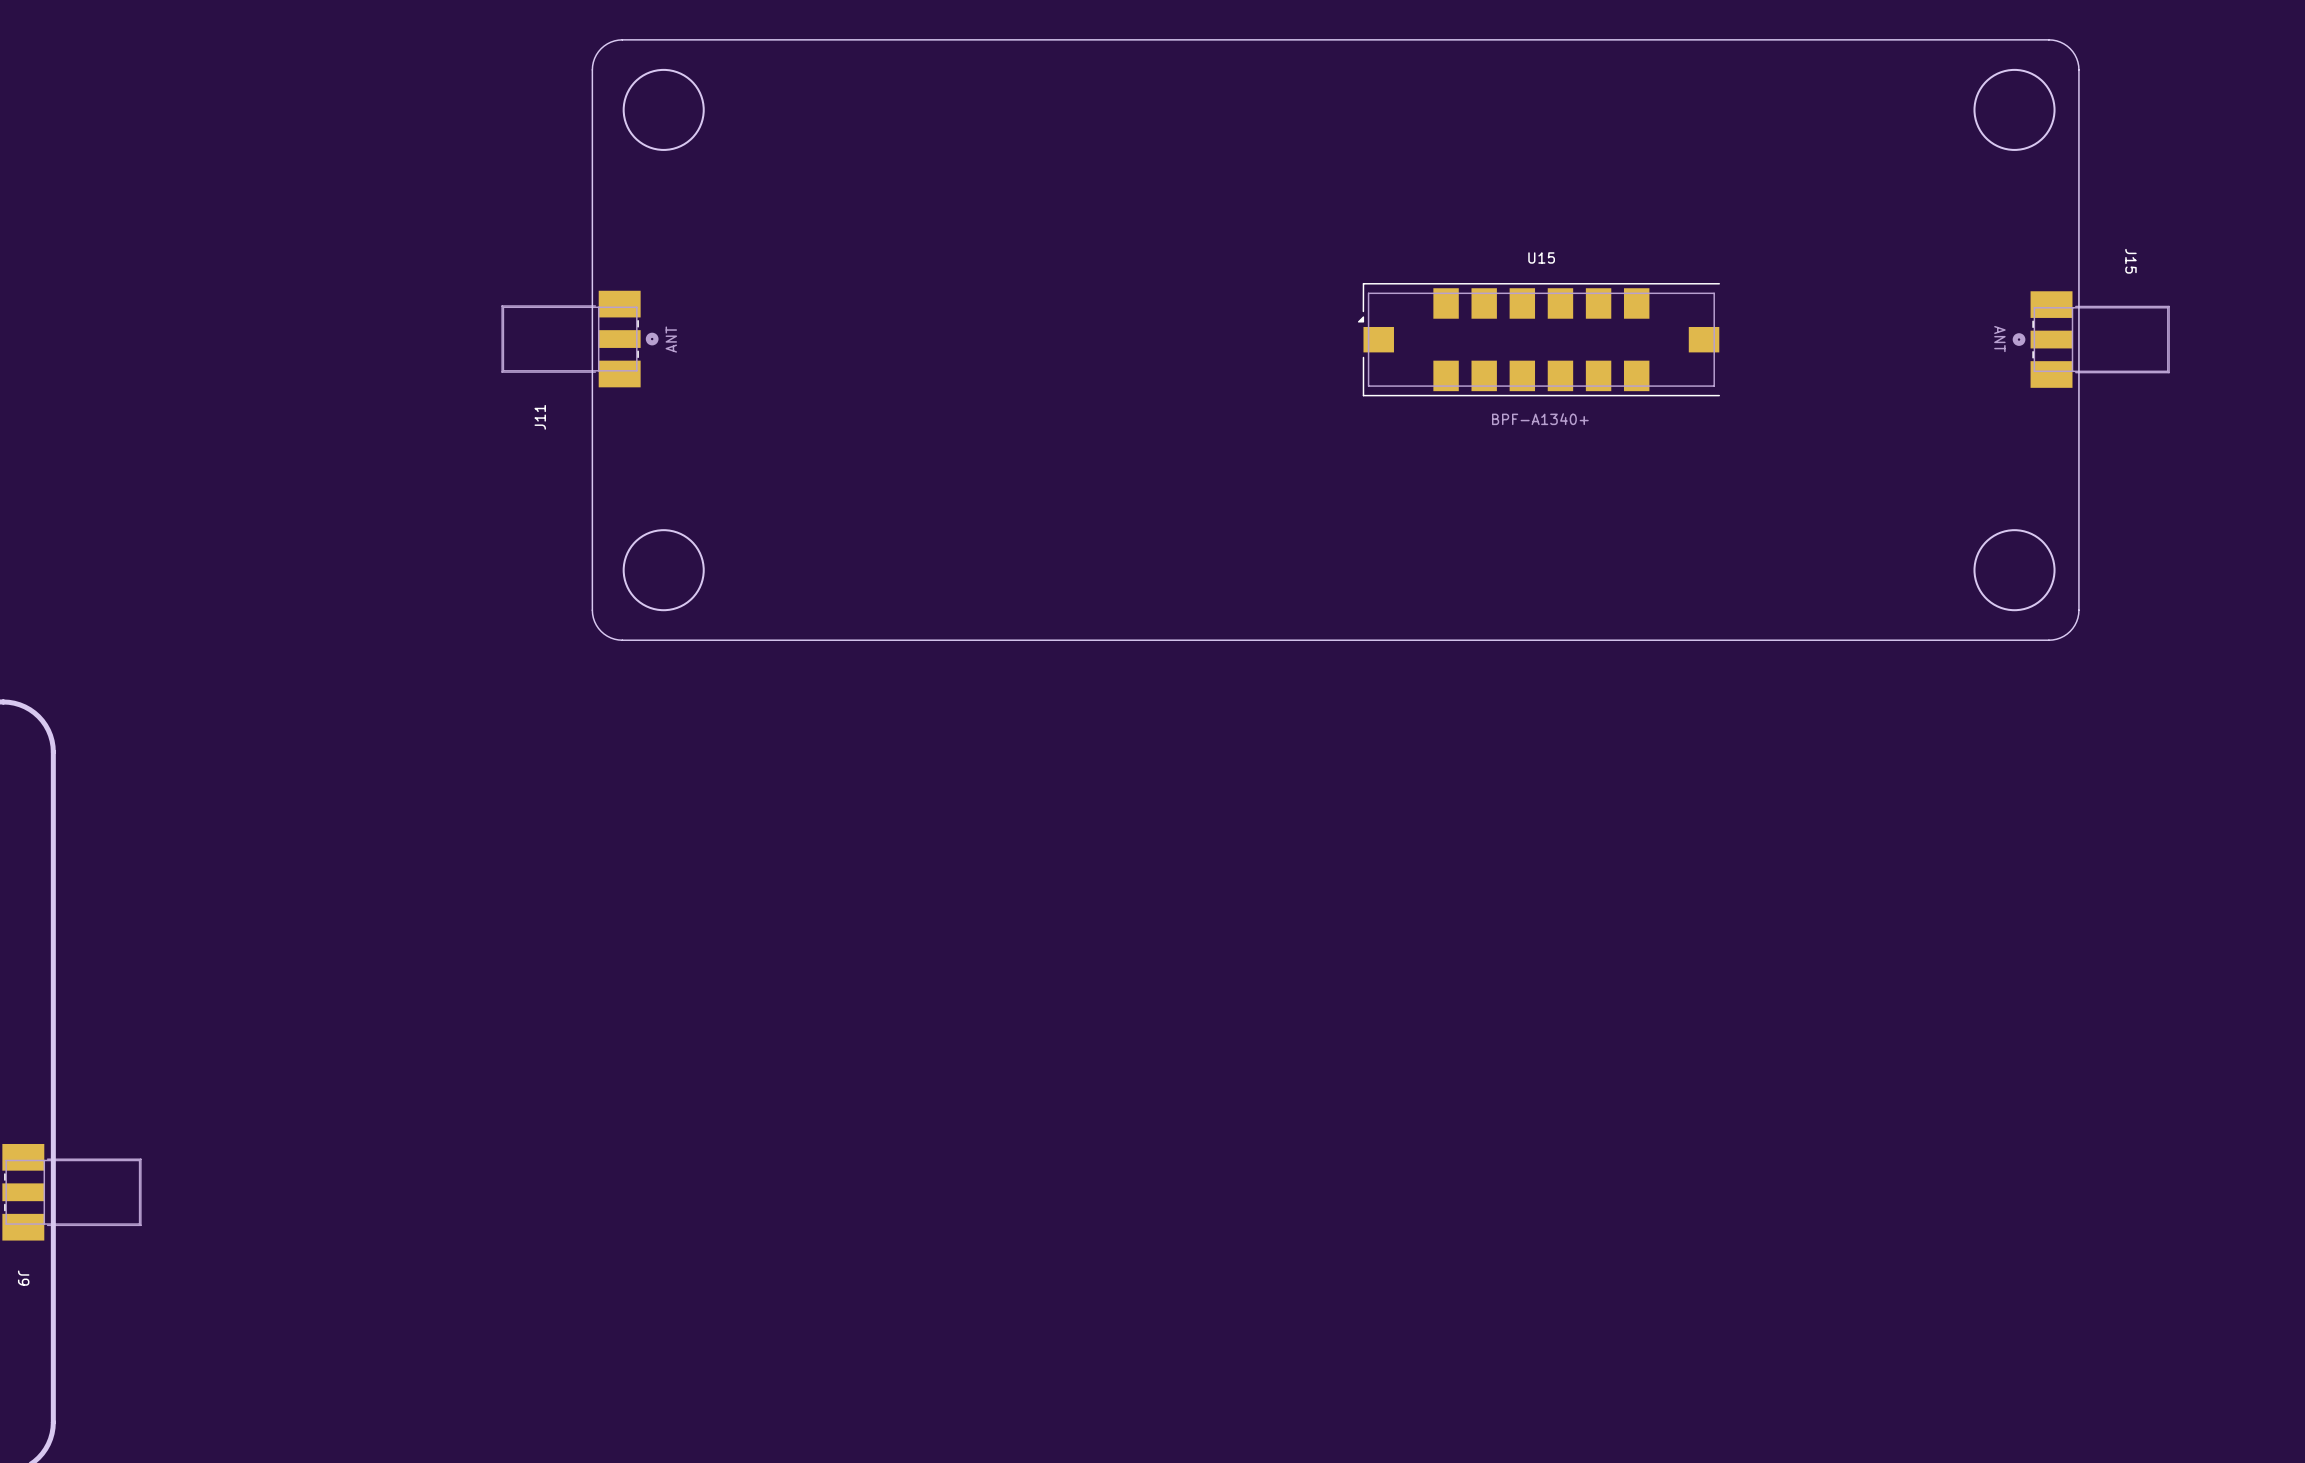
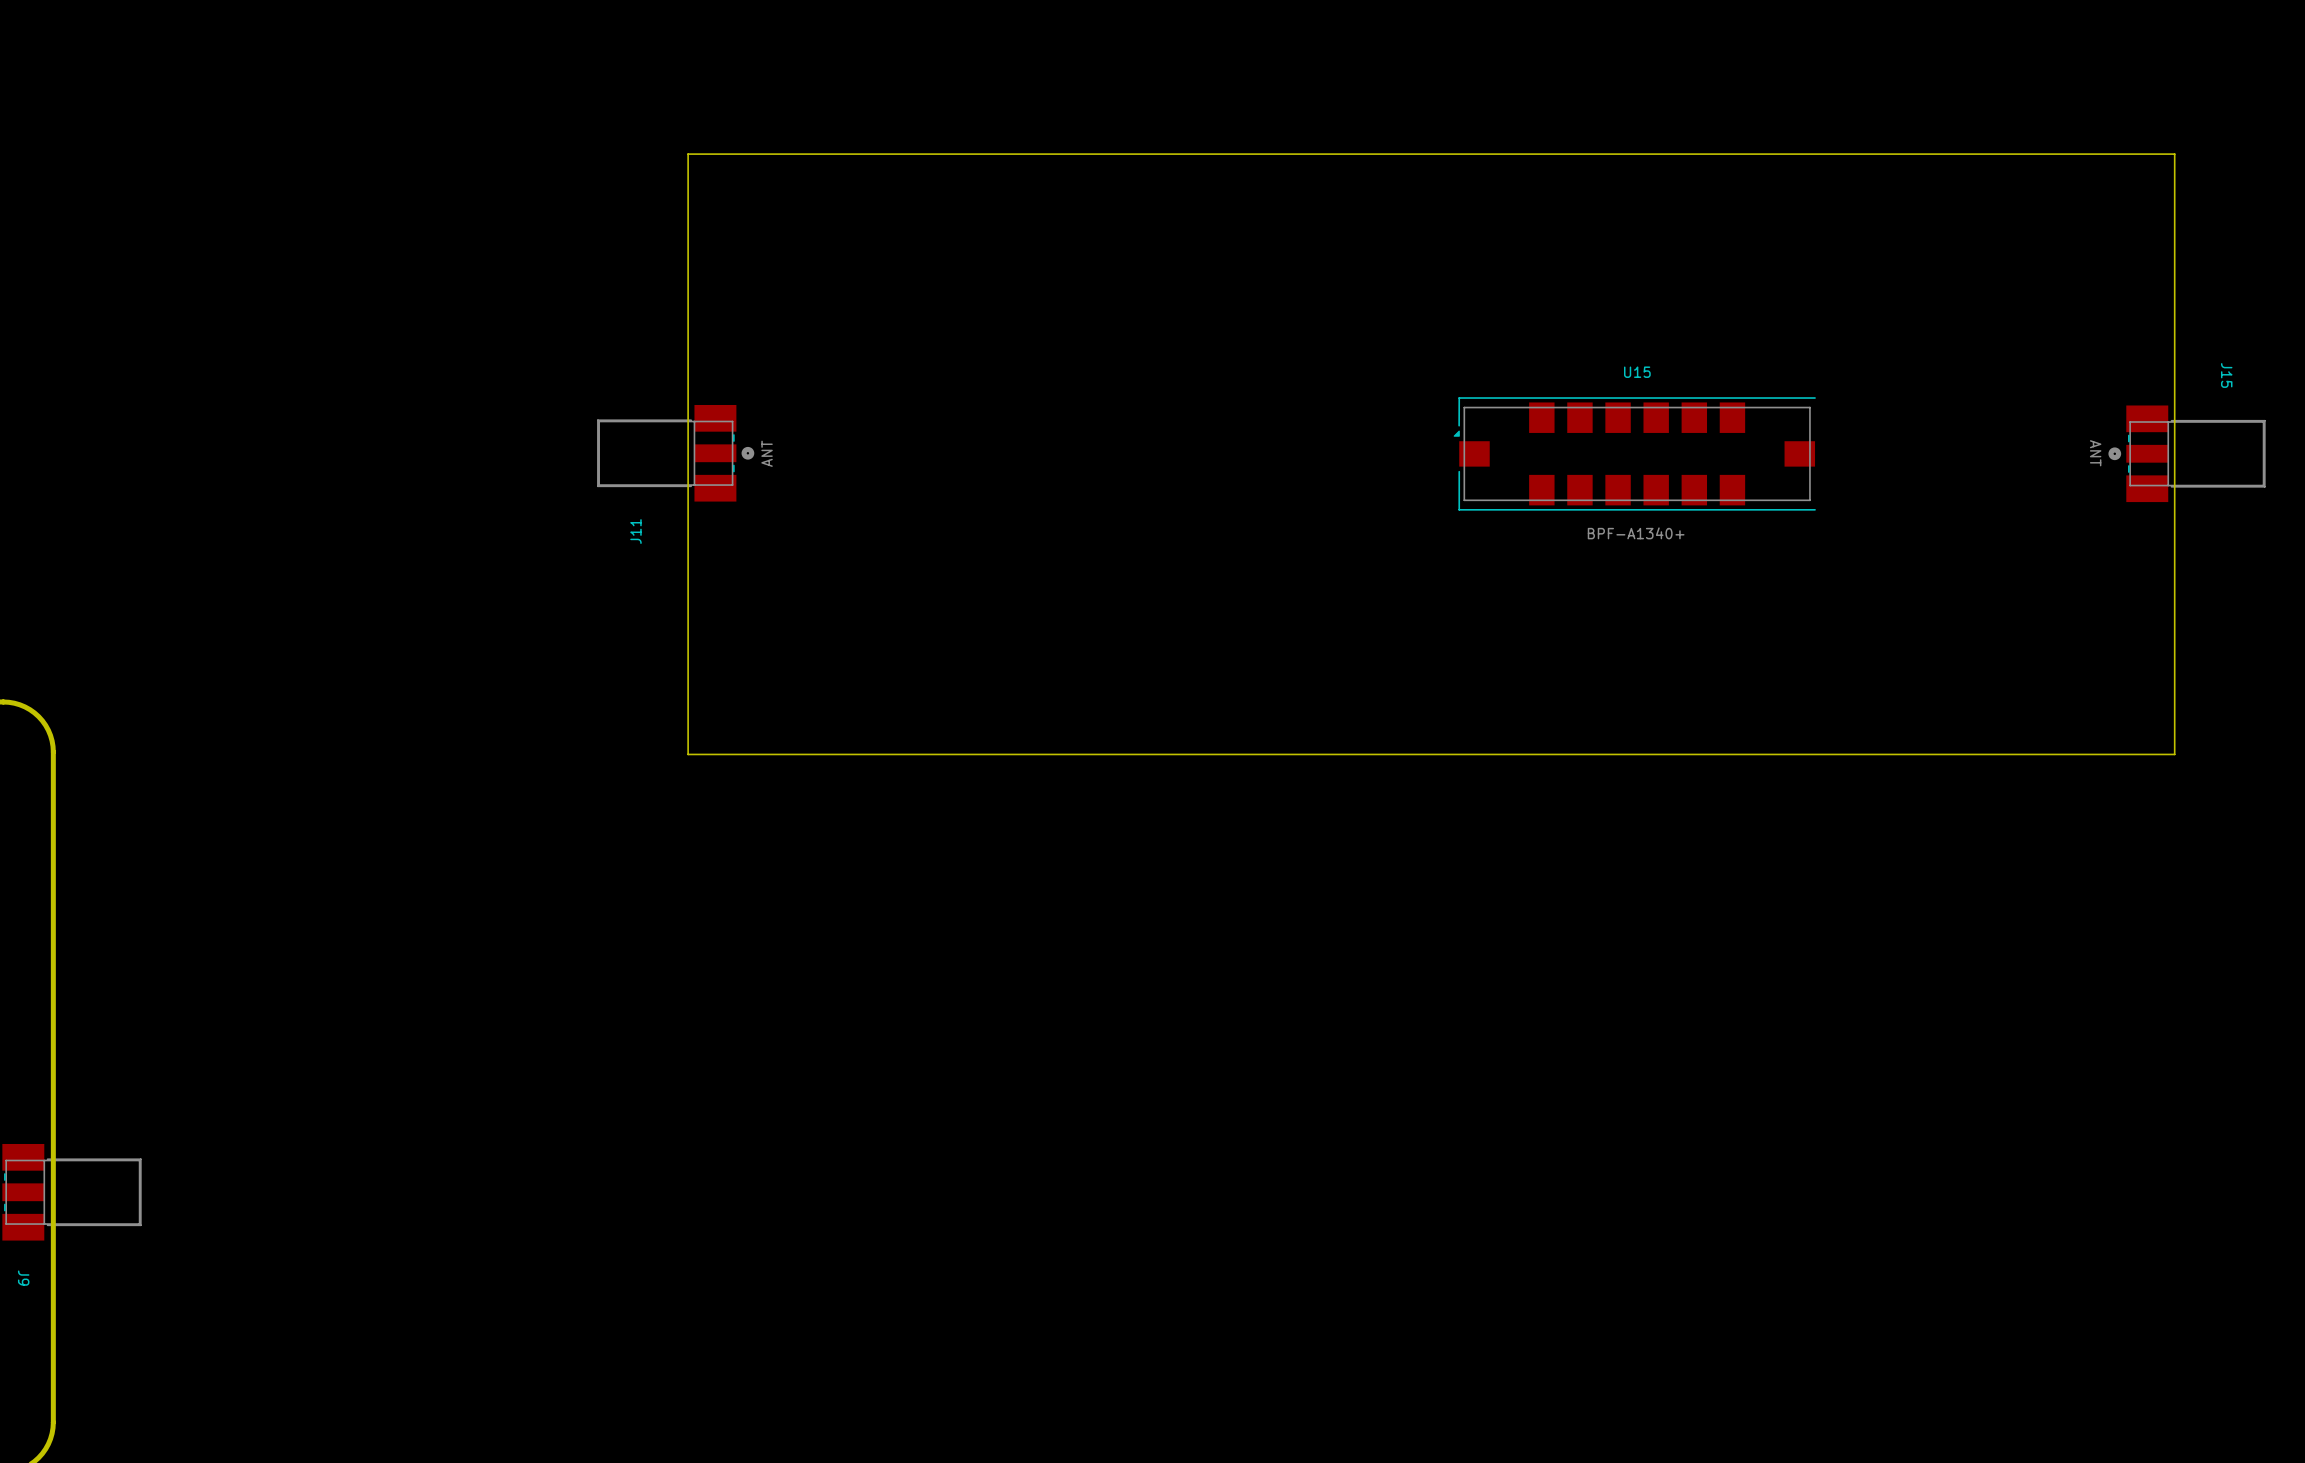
board edge: (622, 39) (2048, 39) (2060, 42) (2072, 51) (2076, 58) (2078, 69) (2078, 610) (2076, 621) (2070, 631) (2063, 636) (2048, 640) (622, 640) (610, 637) (598, 628) (594, 621) (592, 610) (592, 69) (594, 58) (601, 48) (610, 42) (622, 39) -> (688, 154) (688, 754) (2174, 754) (2174, 154) (688, 154)
round board edge: [622, 68, 705, 151] -> none
round board edge: [1973, 68, 2056, 151] -> none
J11 position: (579, 339) -> (675, 453)
U15 position: (1538, 339) -> (1634, 453)
J15 position: (2091, 339) -> (2187, 453)
round board edge: [622, 529, 705, 612] -> none
round board edge: [1973, 529, 2056, 612] -> none

